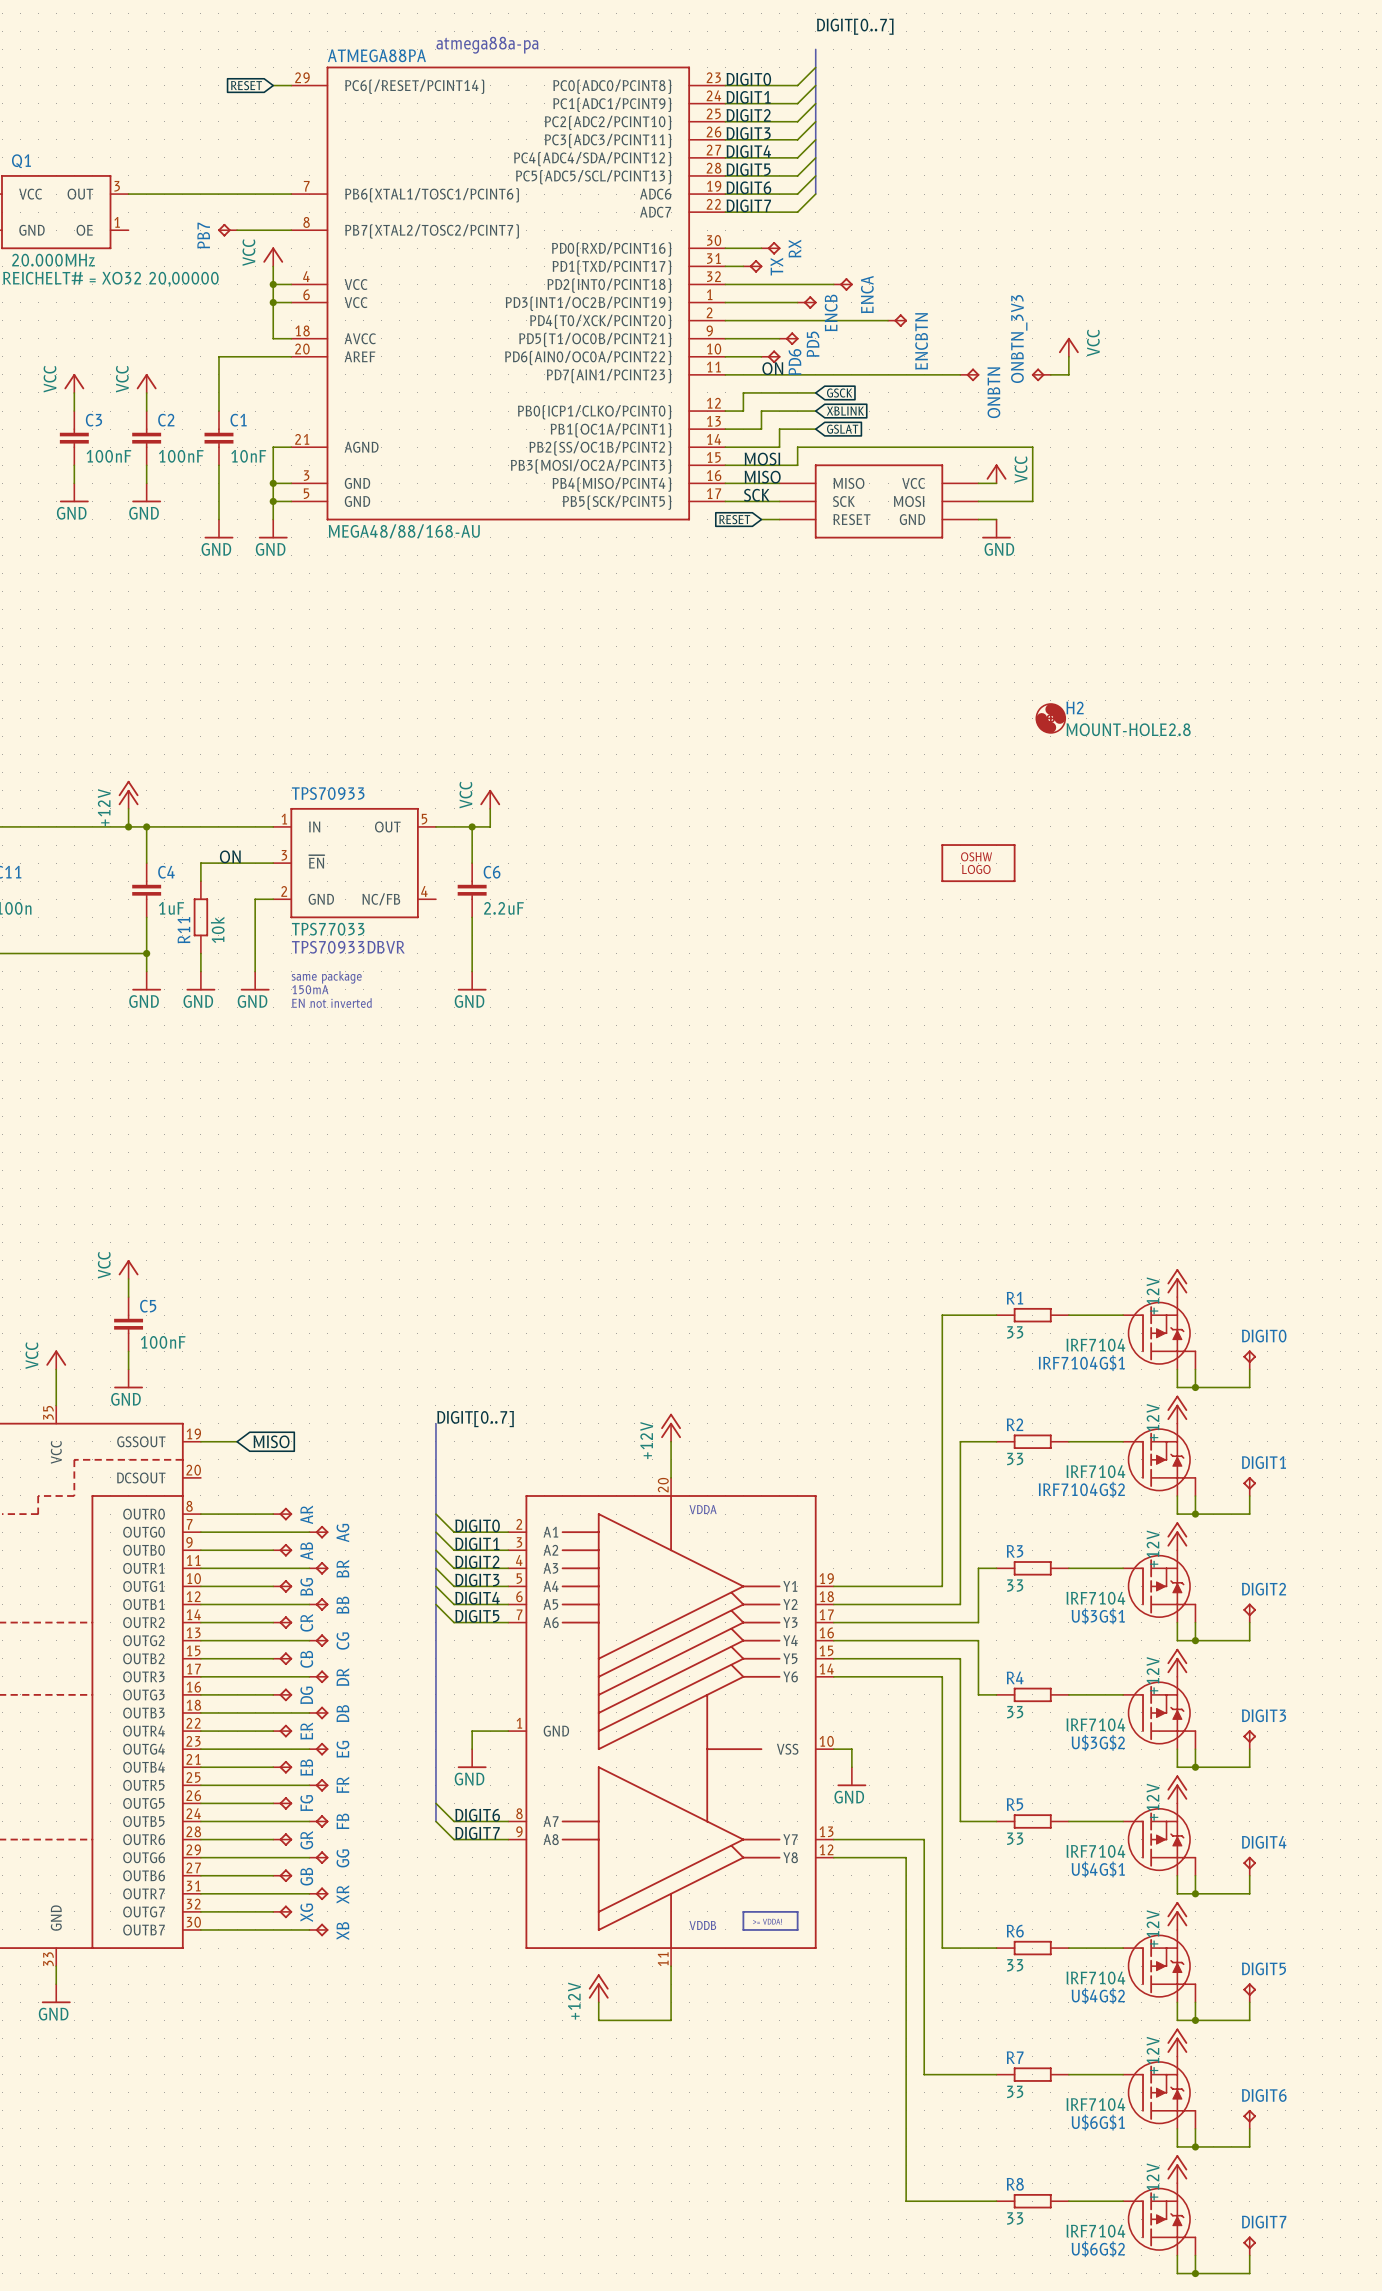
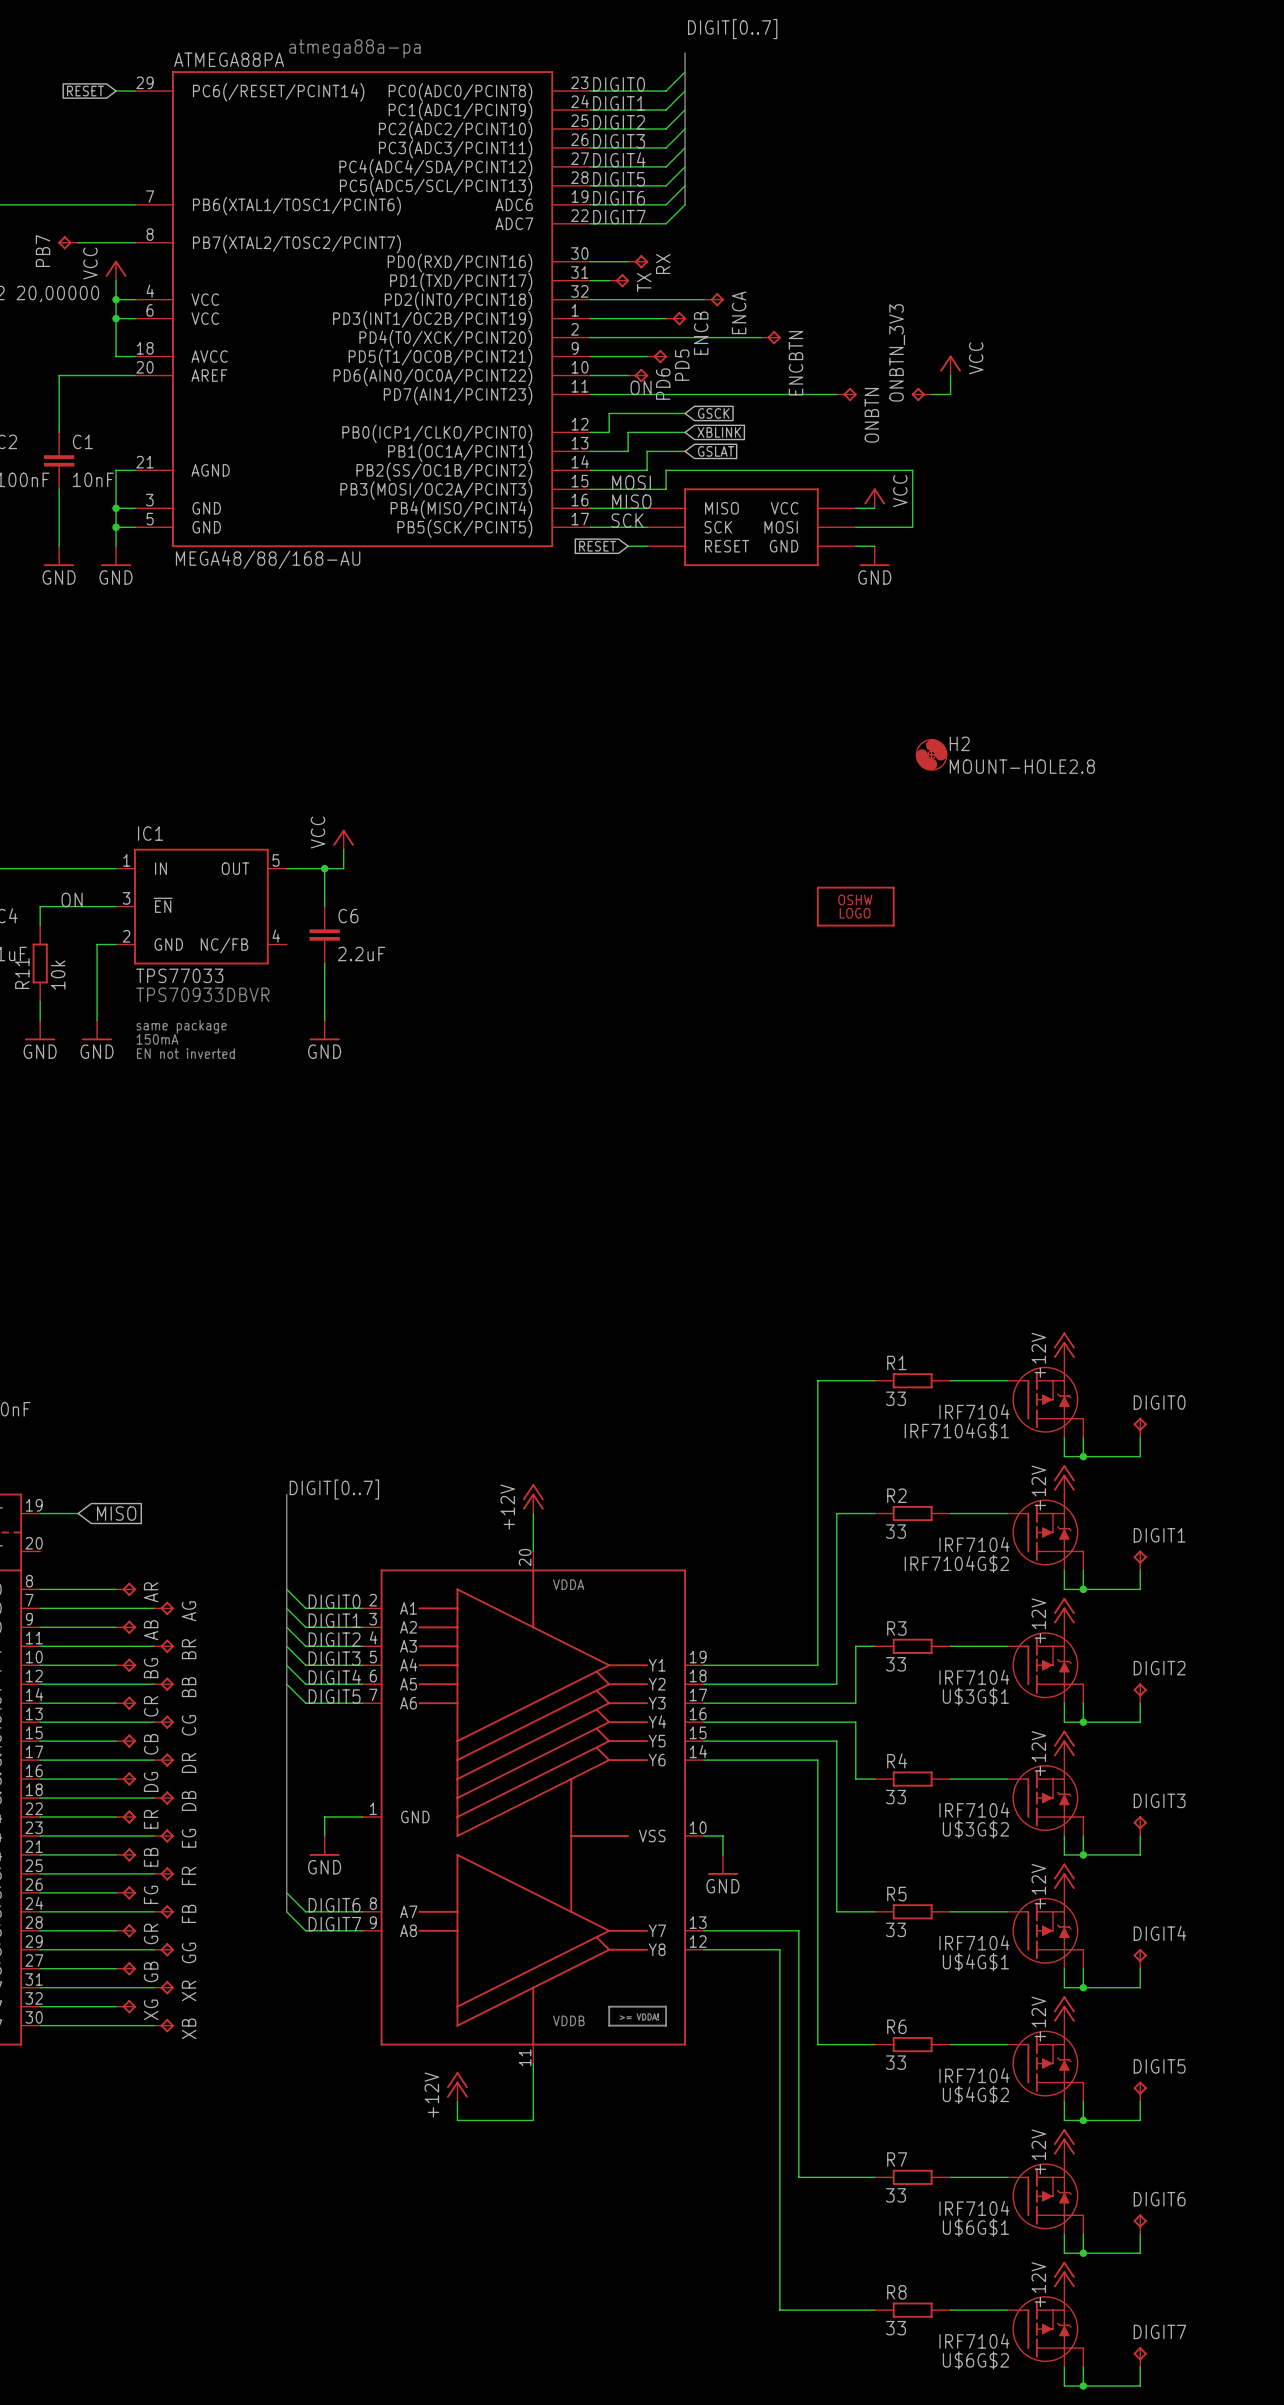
TPS70933 name: TPS70933 (328, 793) -> IC1 (150, 833)

